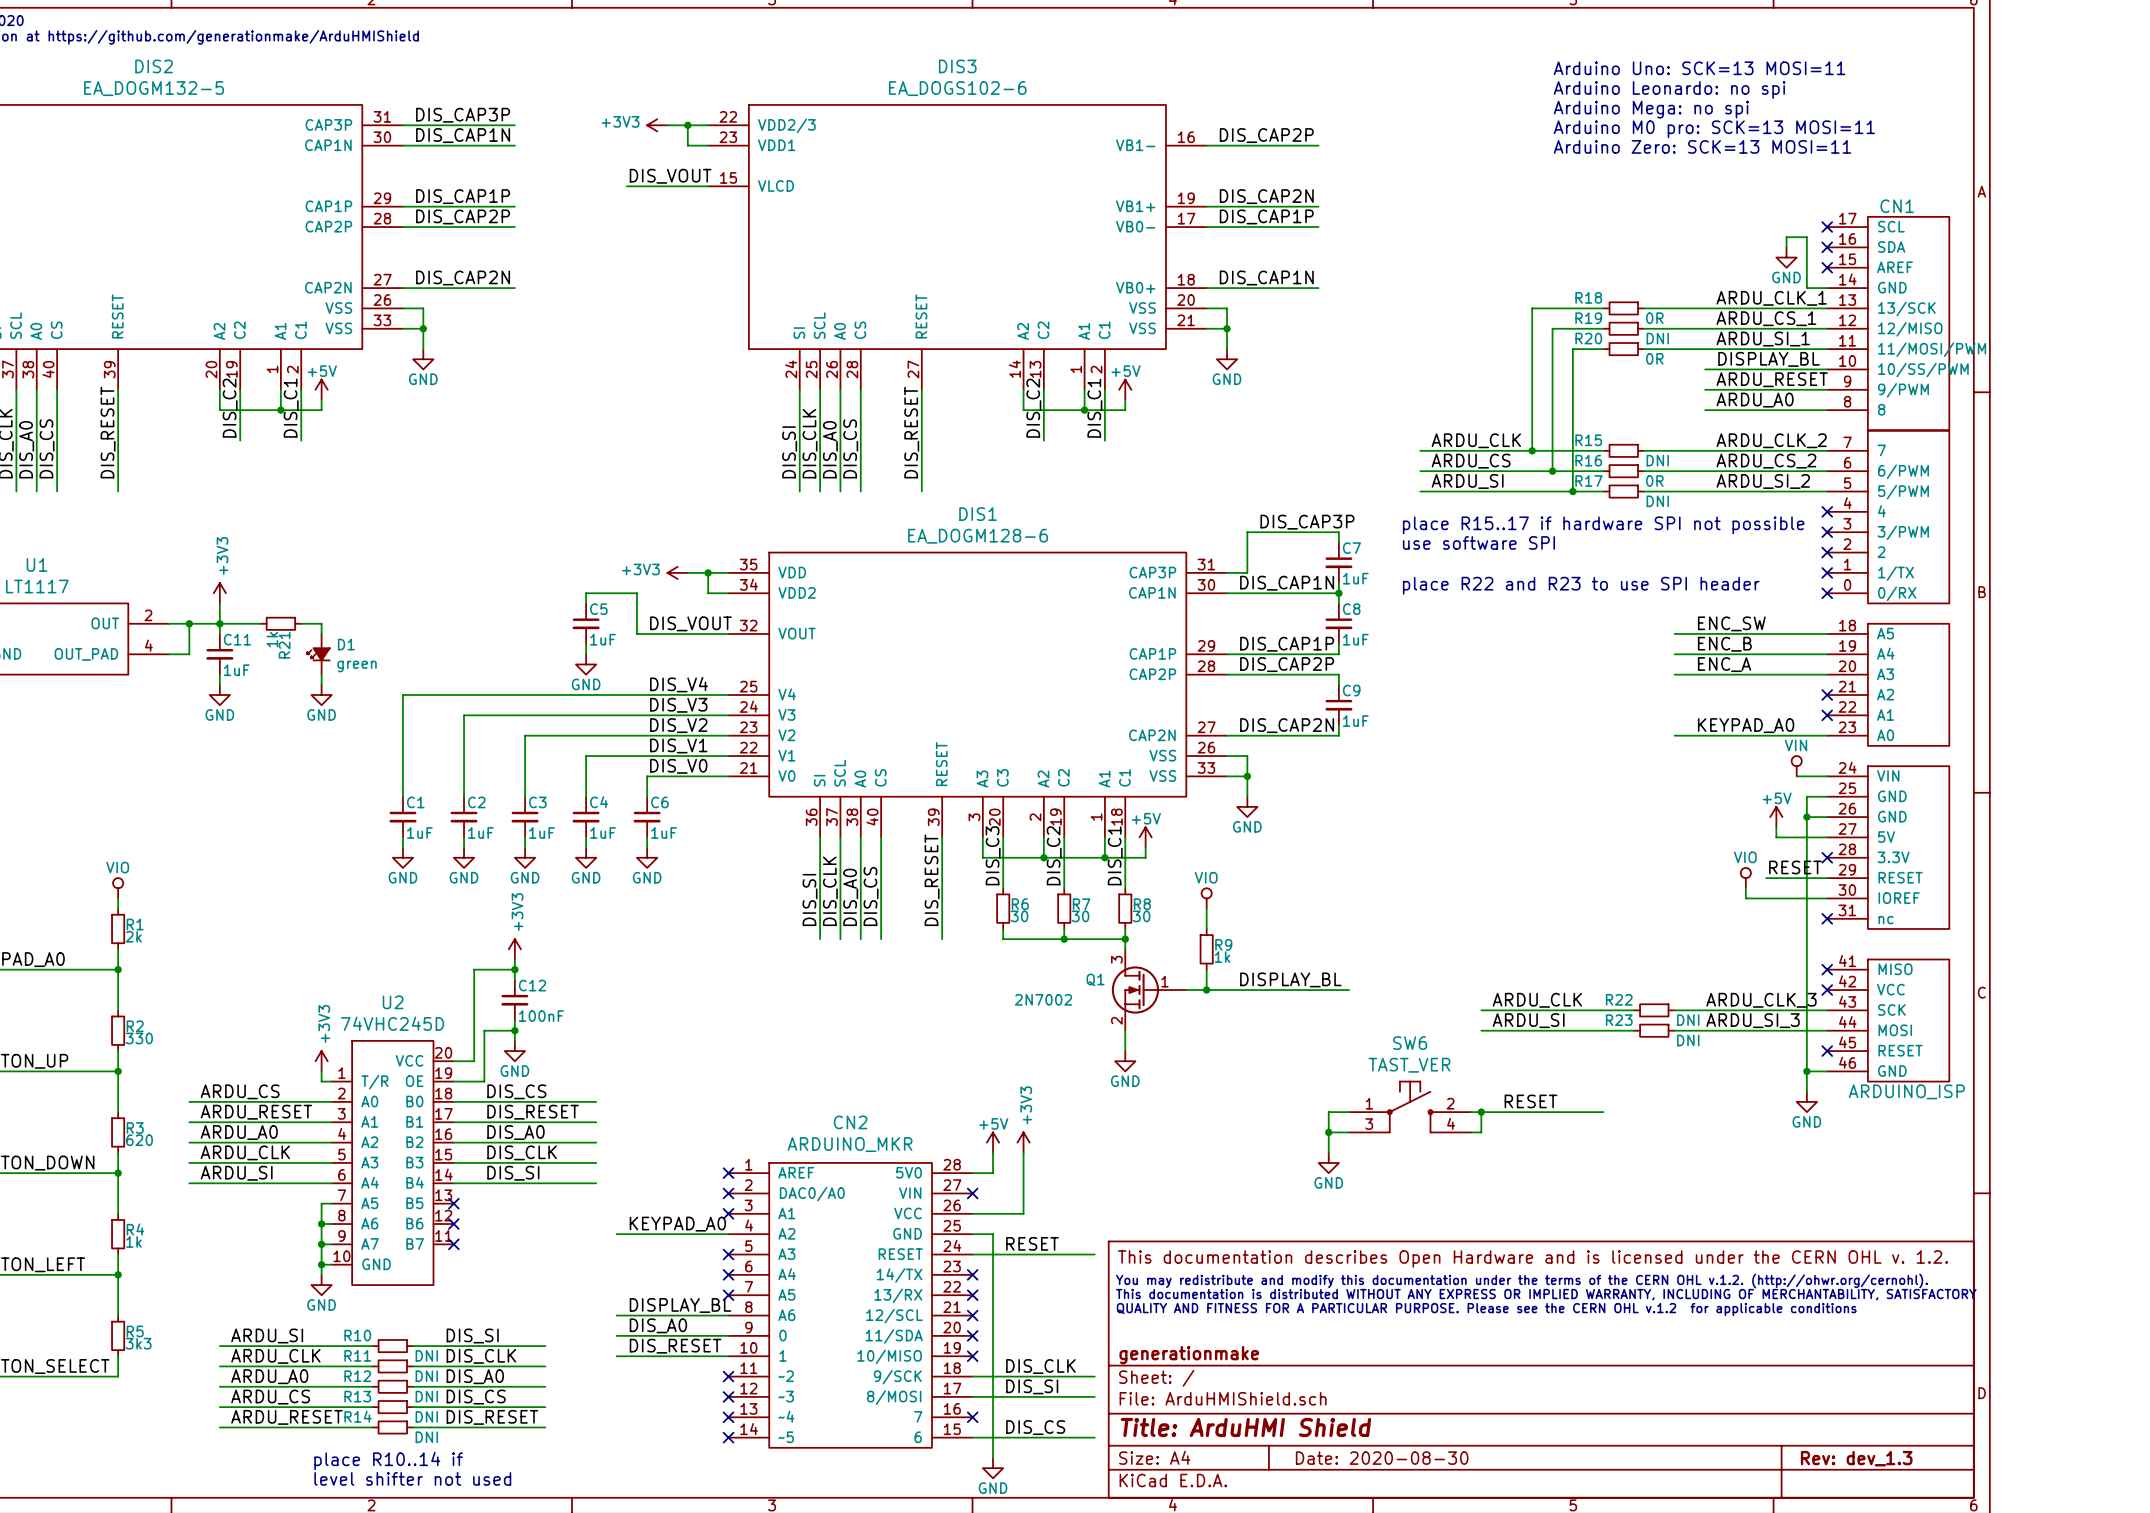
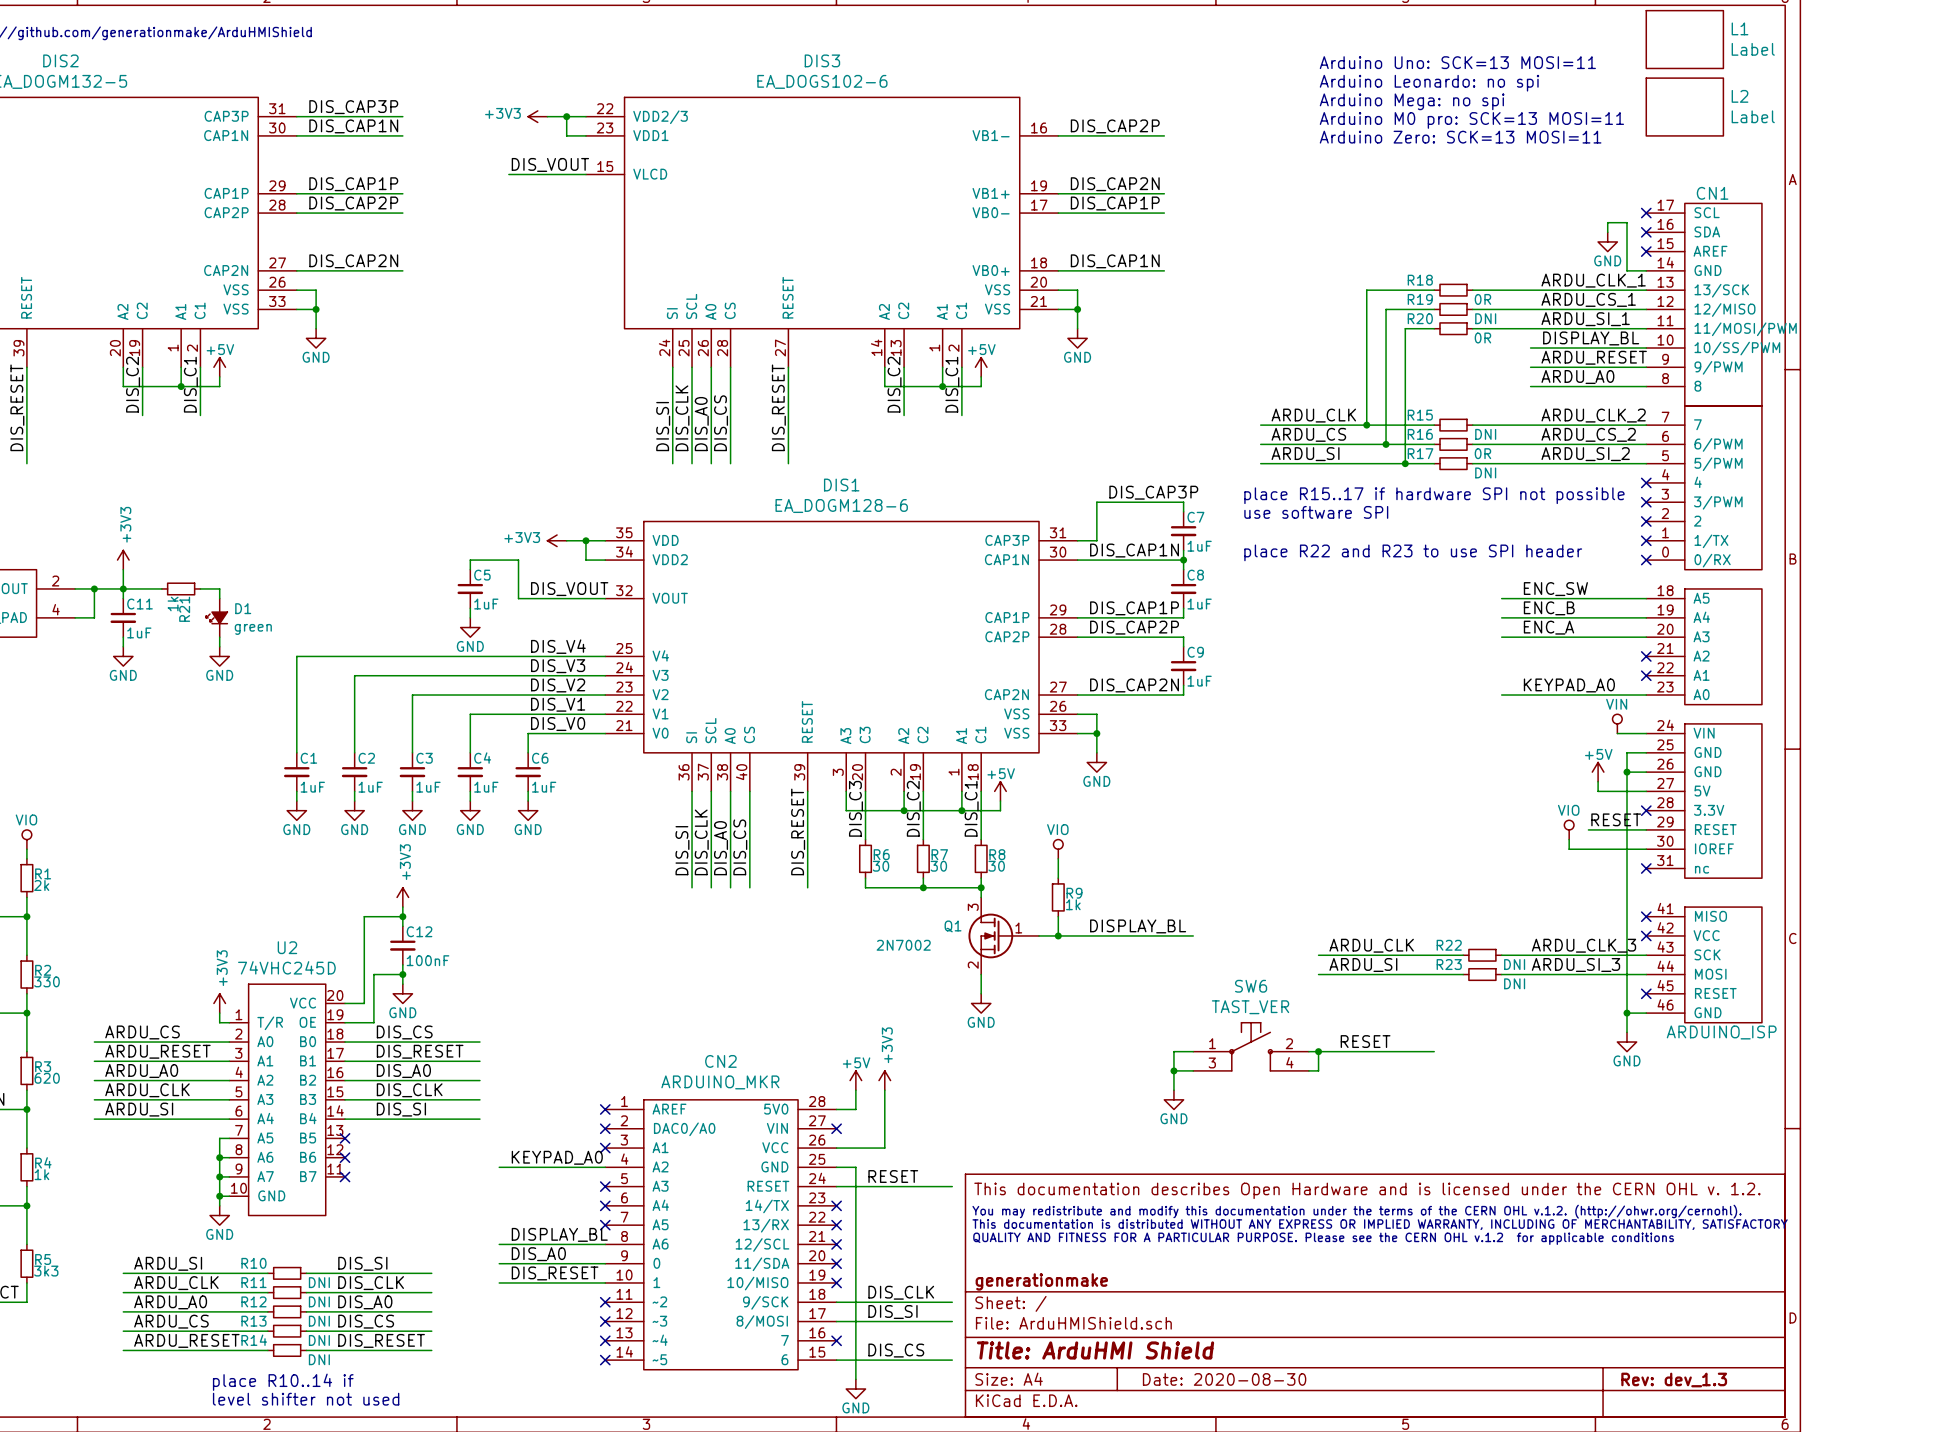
L1: none -> Label (1684, 39)
text position: Arduino Uno: SCK=13 MOSI=11 (1699, 68) -> Arduino Uno: SCK=13 MOSI=11 (1457, 62)
text position: Arduino Leonardo: no spi (1669, 89) -> Arduino Leonardo: no spi (1429, 83)
text position: Arduino Mega: no spi (1651, 109) -> Arduino Mega: no spi (1412, 101)
L2: none -> Label (1684, 107)
text position: Arduino M0 pro: SCK=13 MOSI=11 (1714, 129) -> Arduino M0 pro: SCK=13 MOSI=11 (1471, 120)
text position: Arduino Zero: SCK=13 MOSI=11 (1702, 146) -> Arduino Zero: SCK=13 MOSI=11 (1460, 137)

